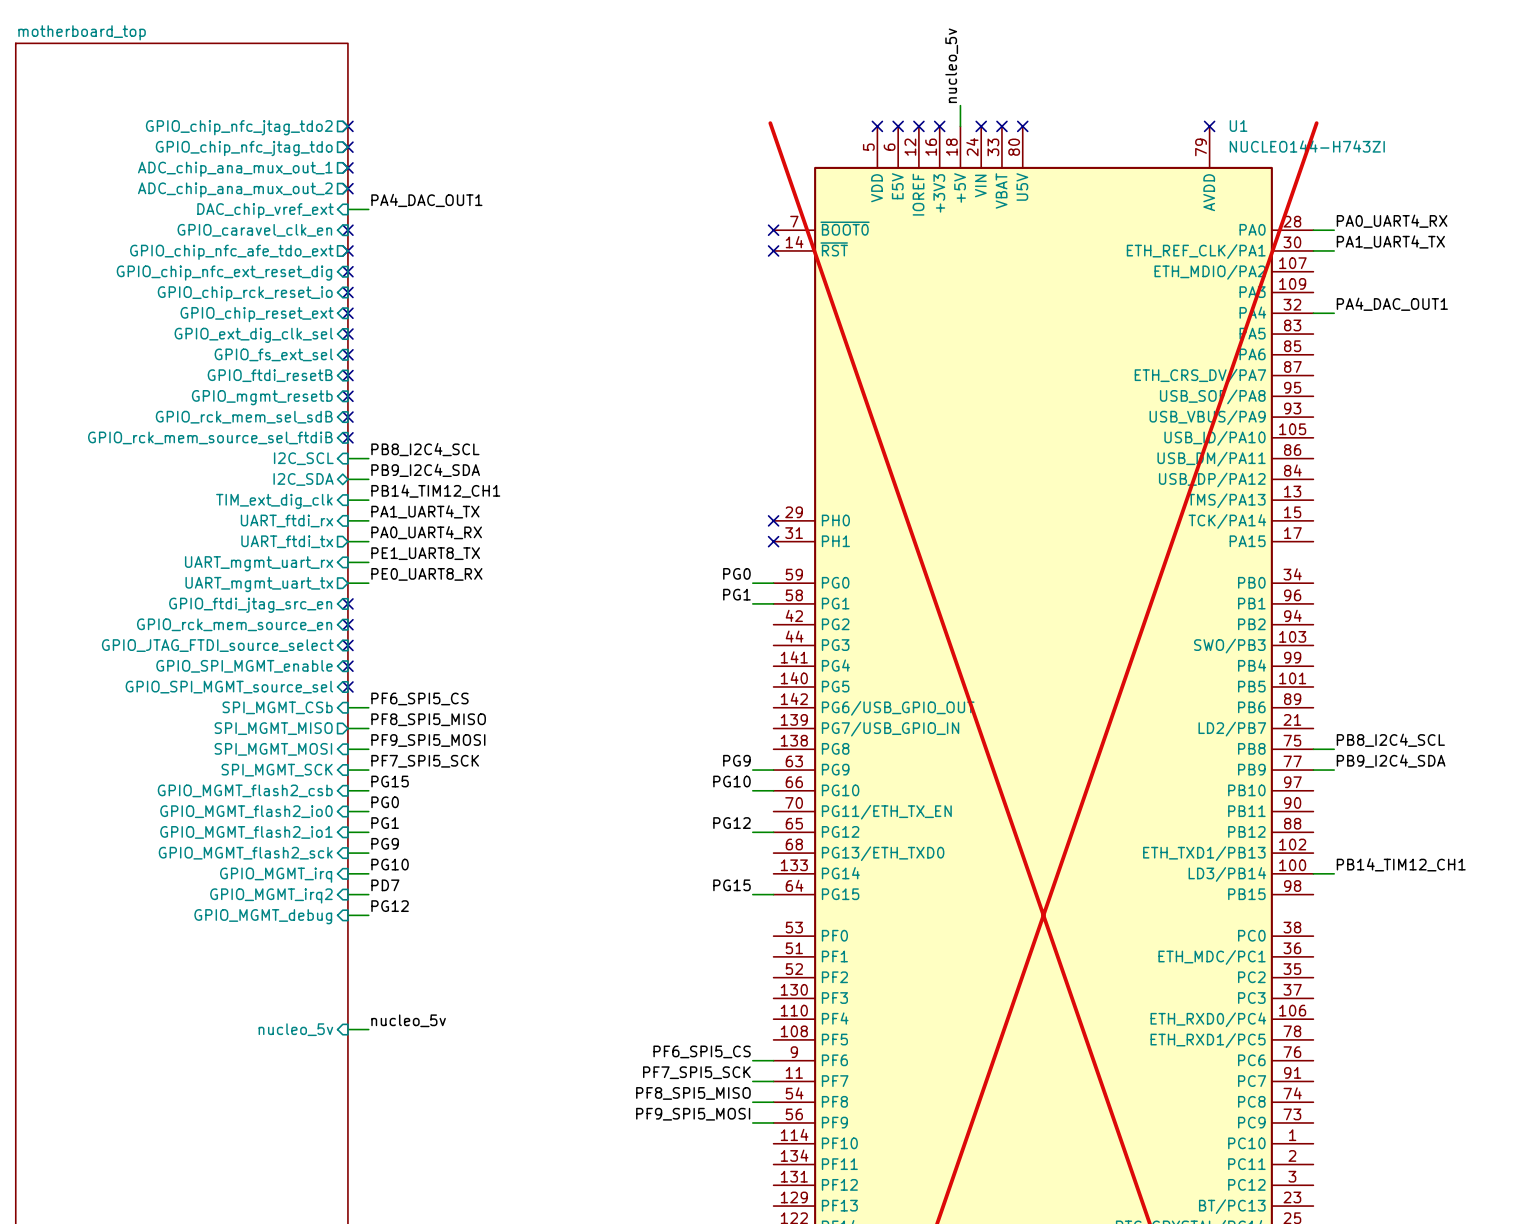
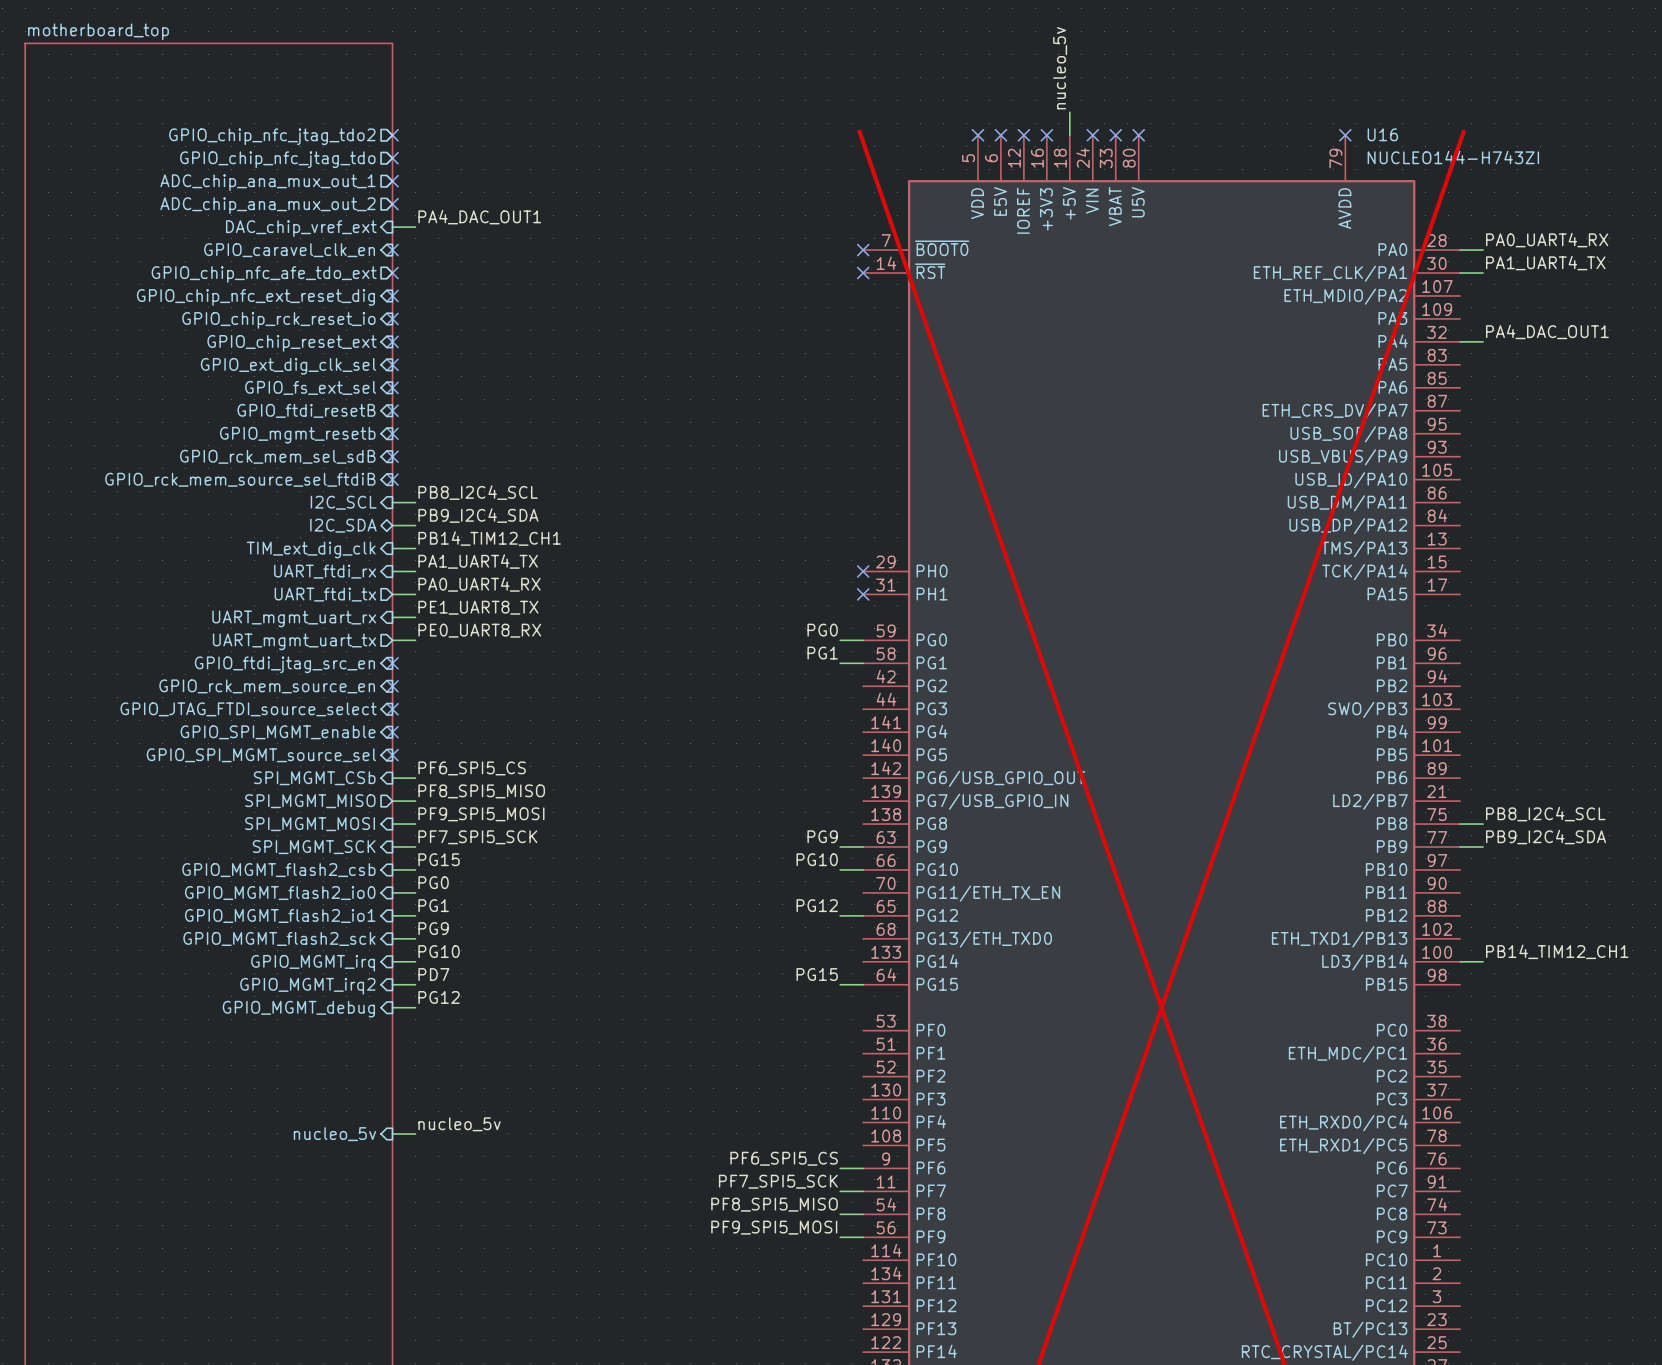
U1 name: U1 (1238, 126) -> U16 (1382, 134)

